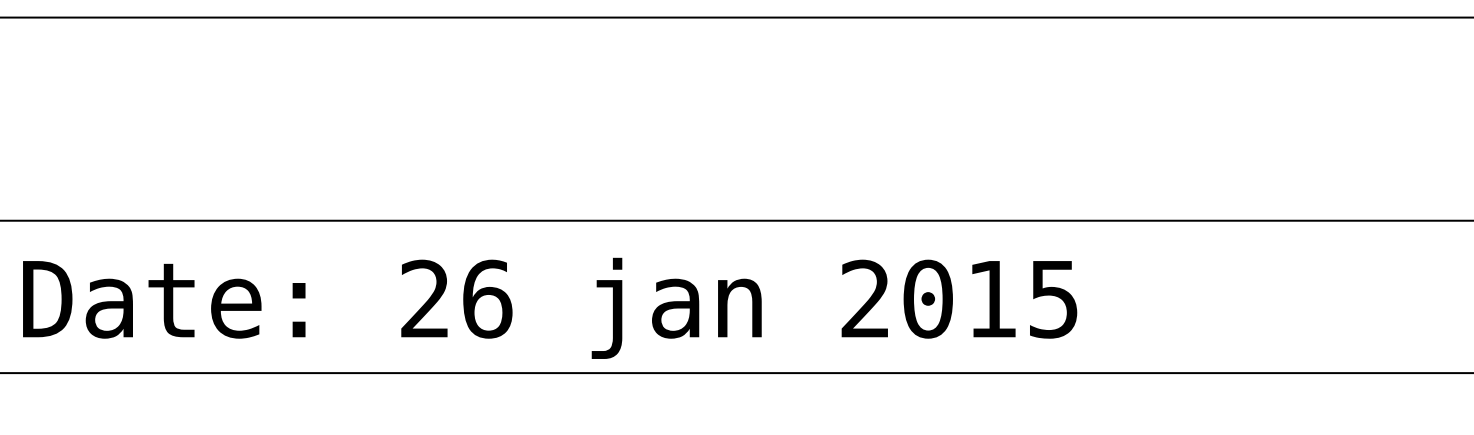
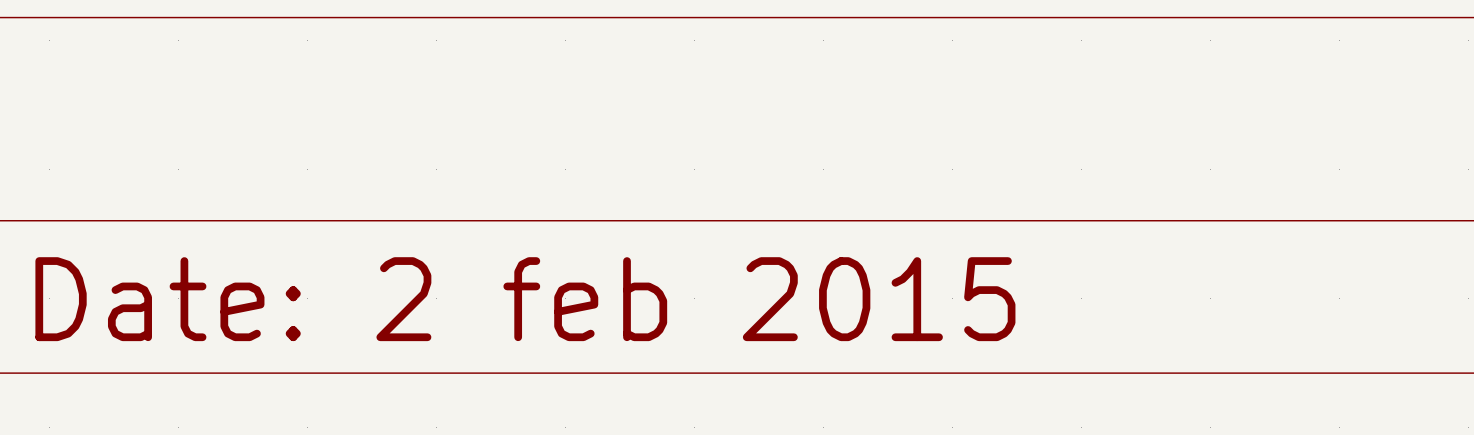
title block: Date: 26 jan 2015 (550, 308) -> Date: 2 feb 2015 (525, 299)

